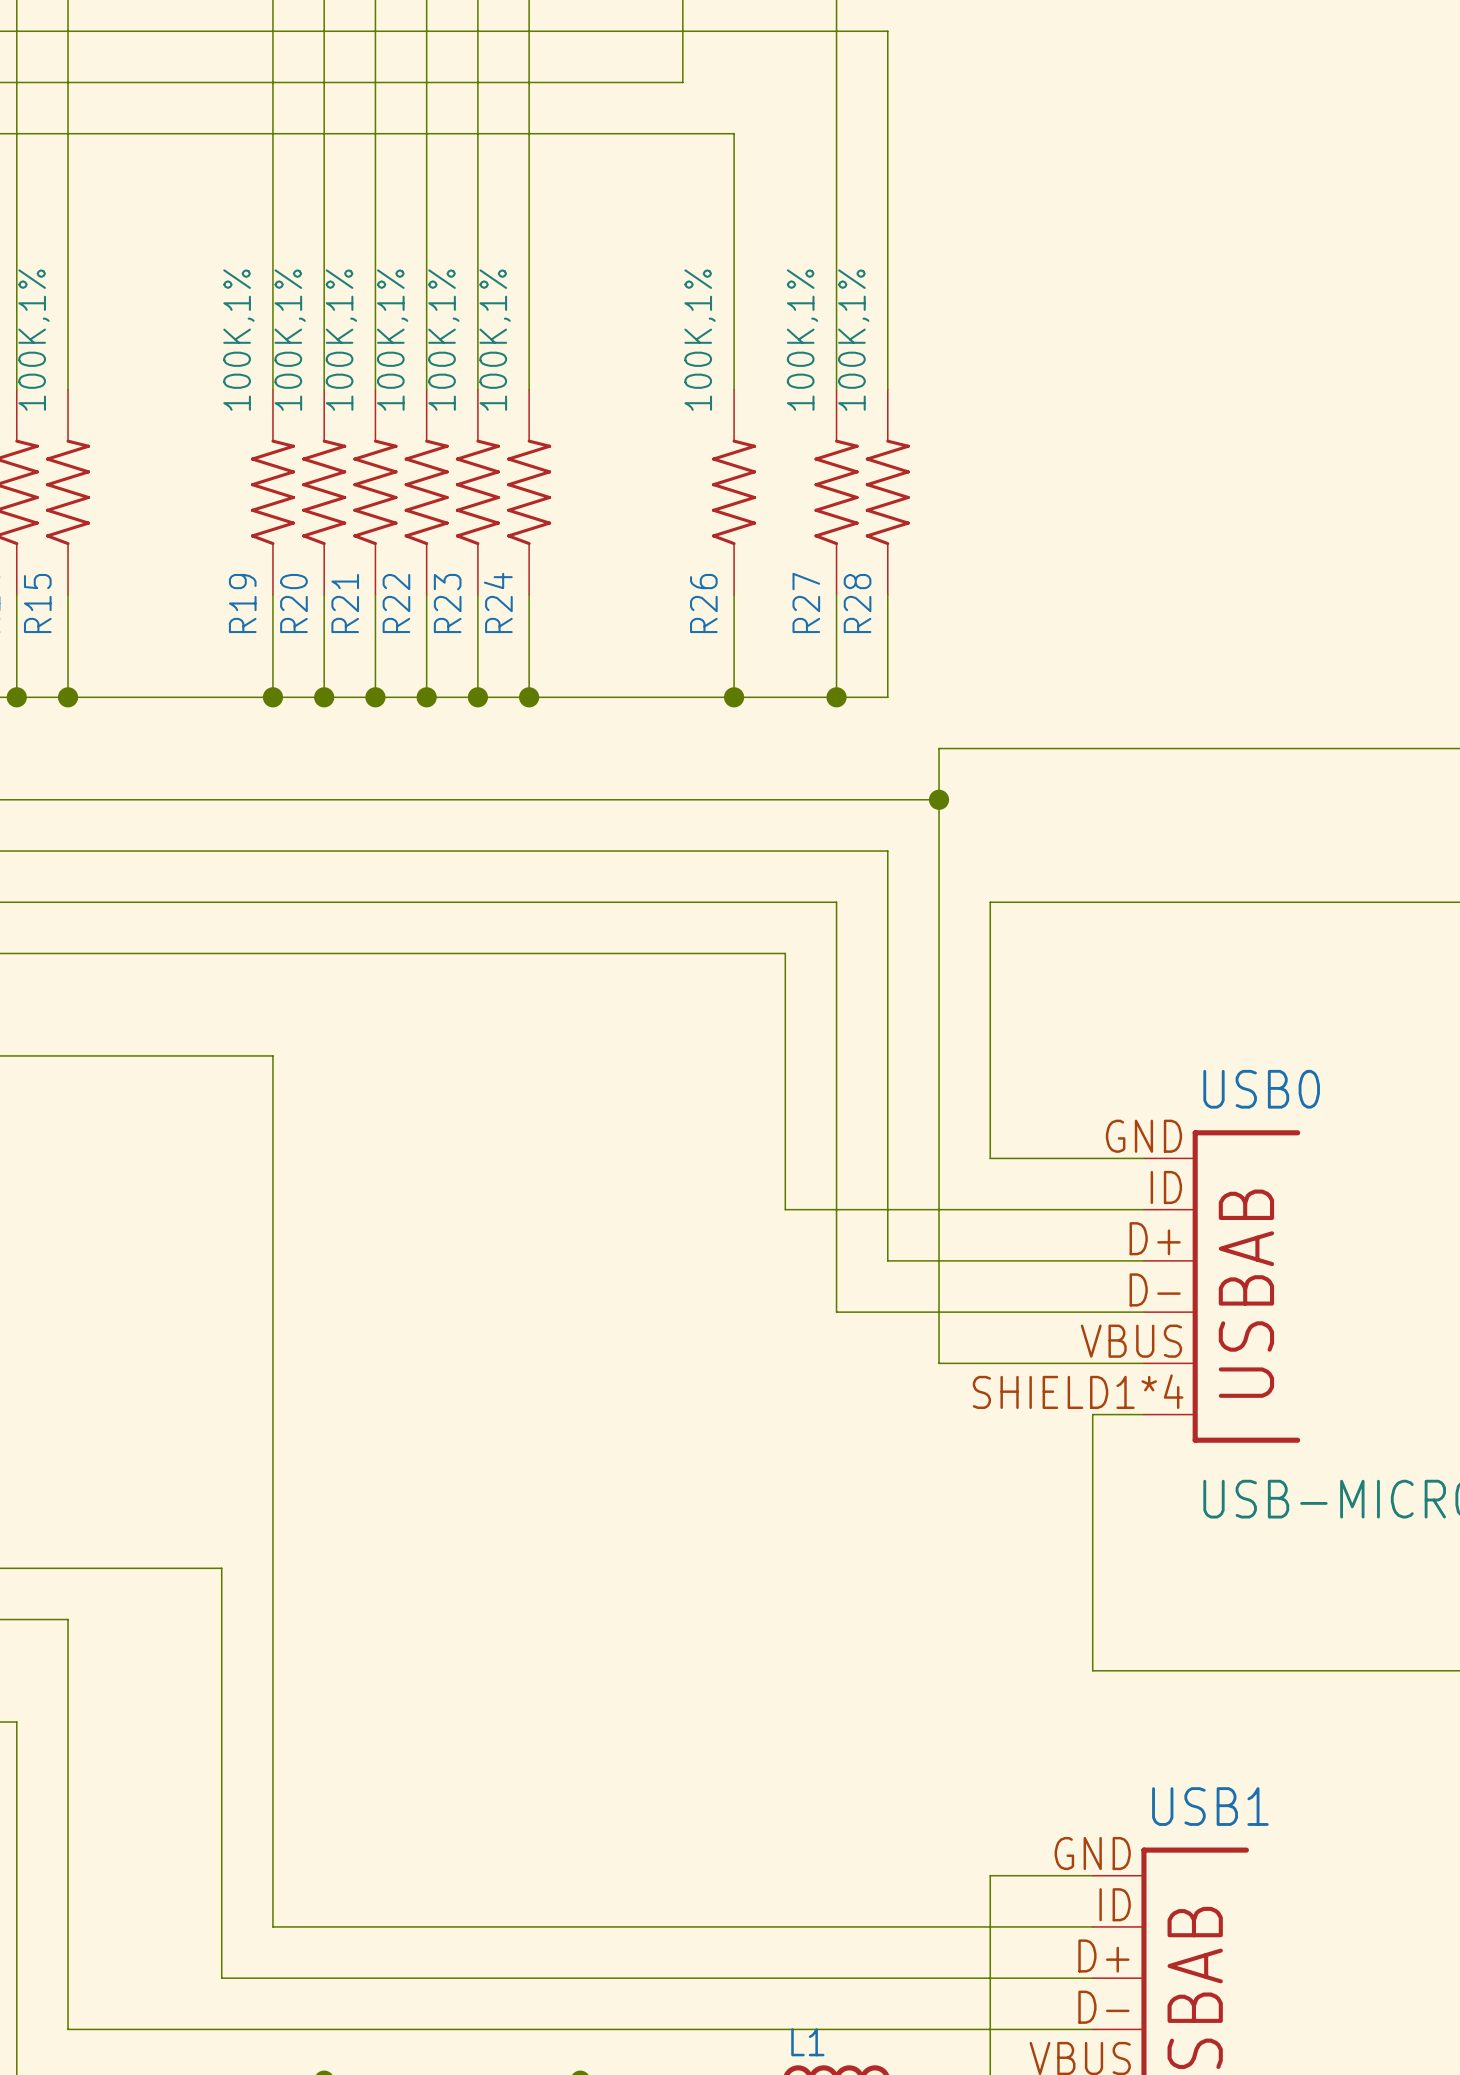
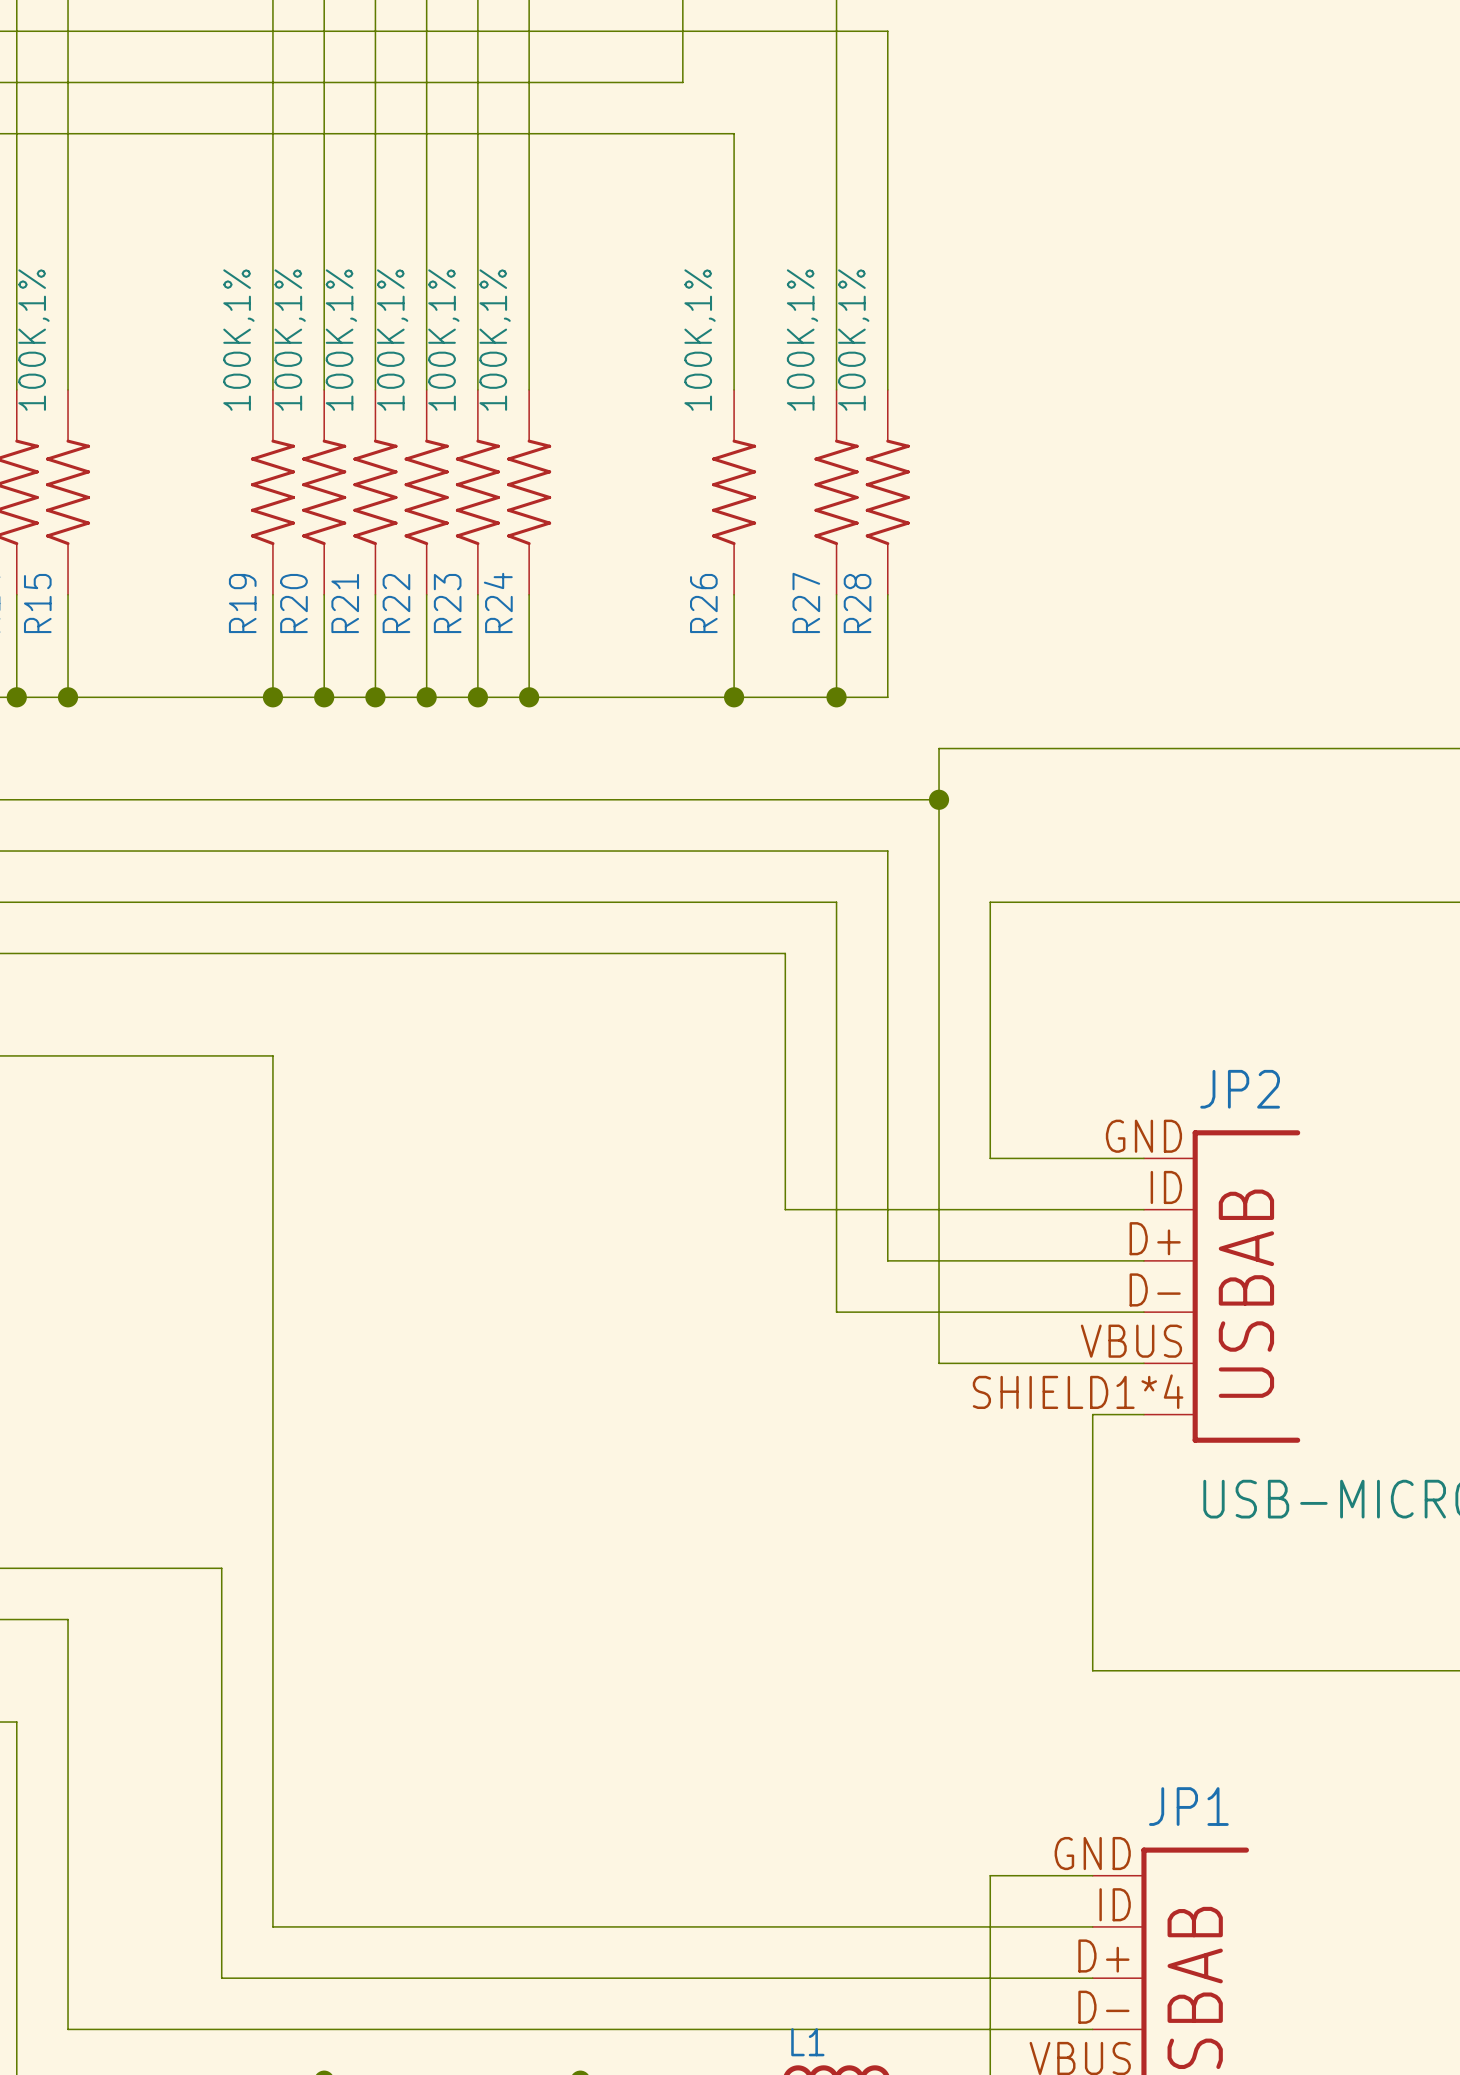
USB0 name: USB0 (1261, 1089) -> JP2 (1240, 1089)
USB1 name: USB1 (1210, 1806) -> JP1 (1188, 1806)

